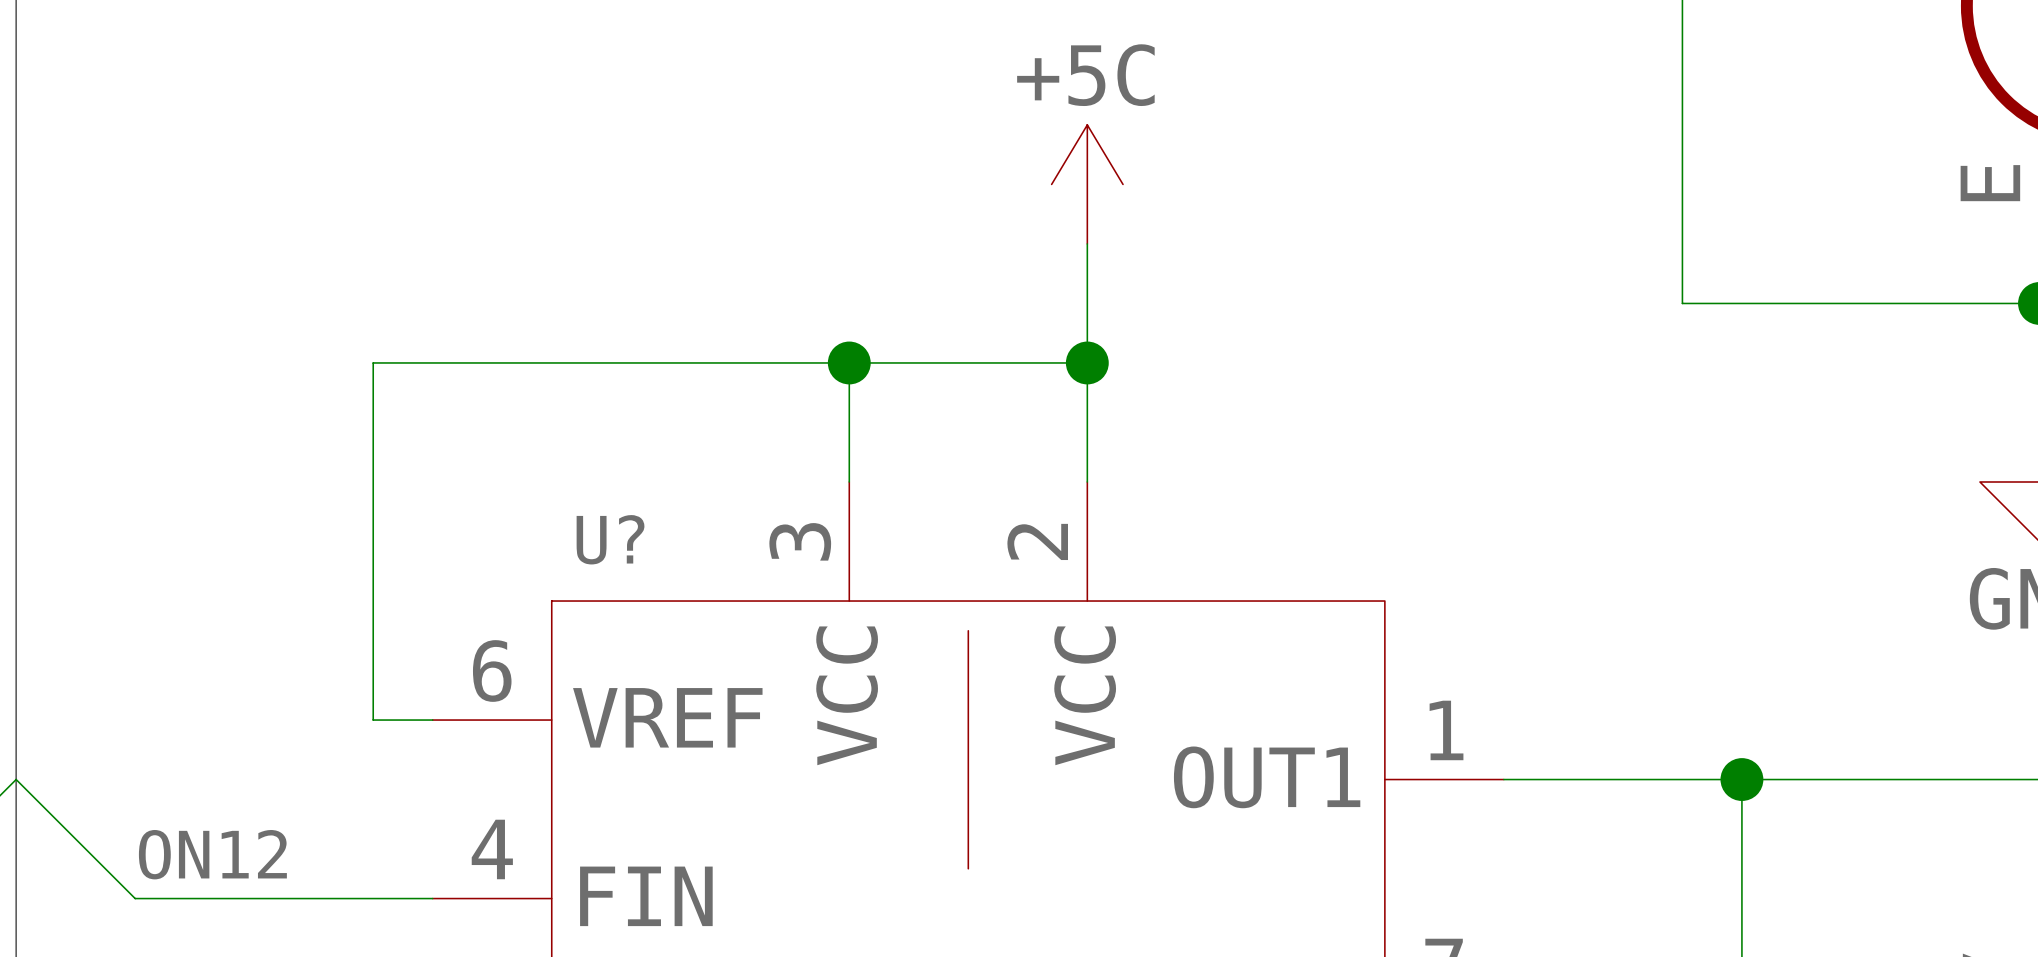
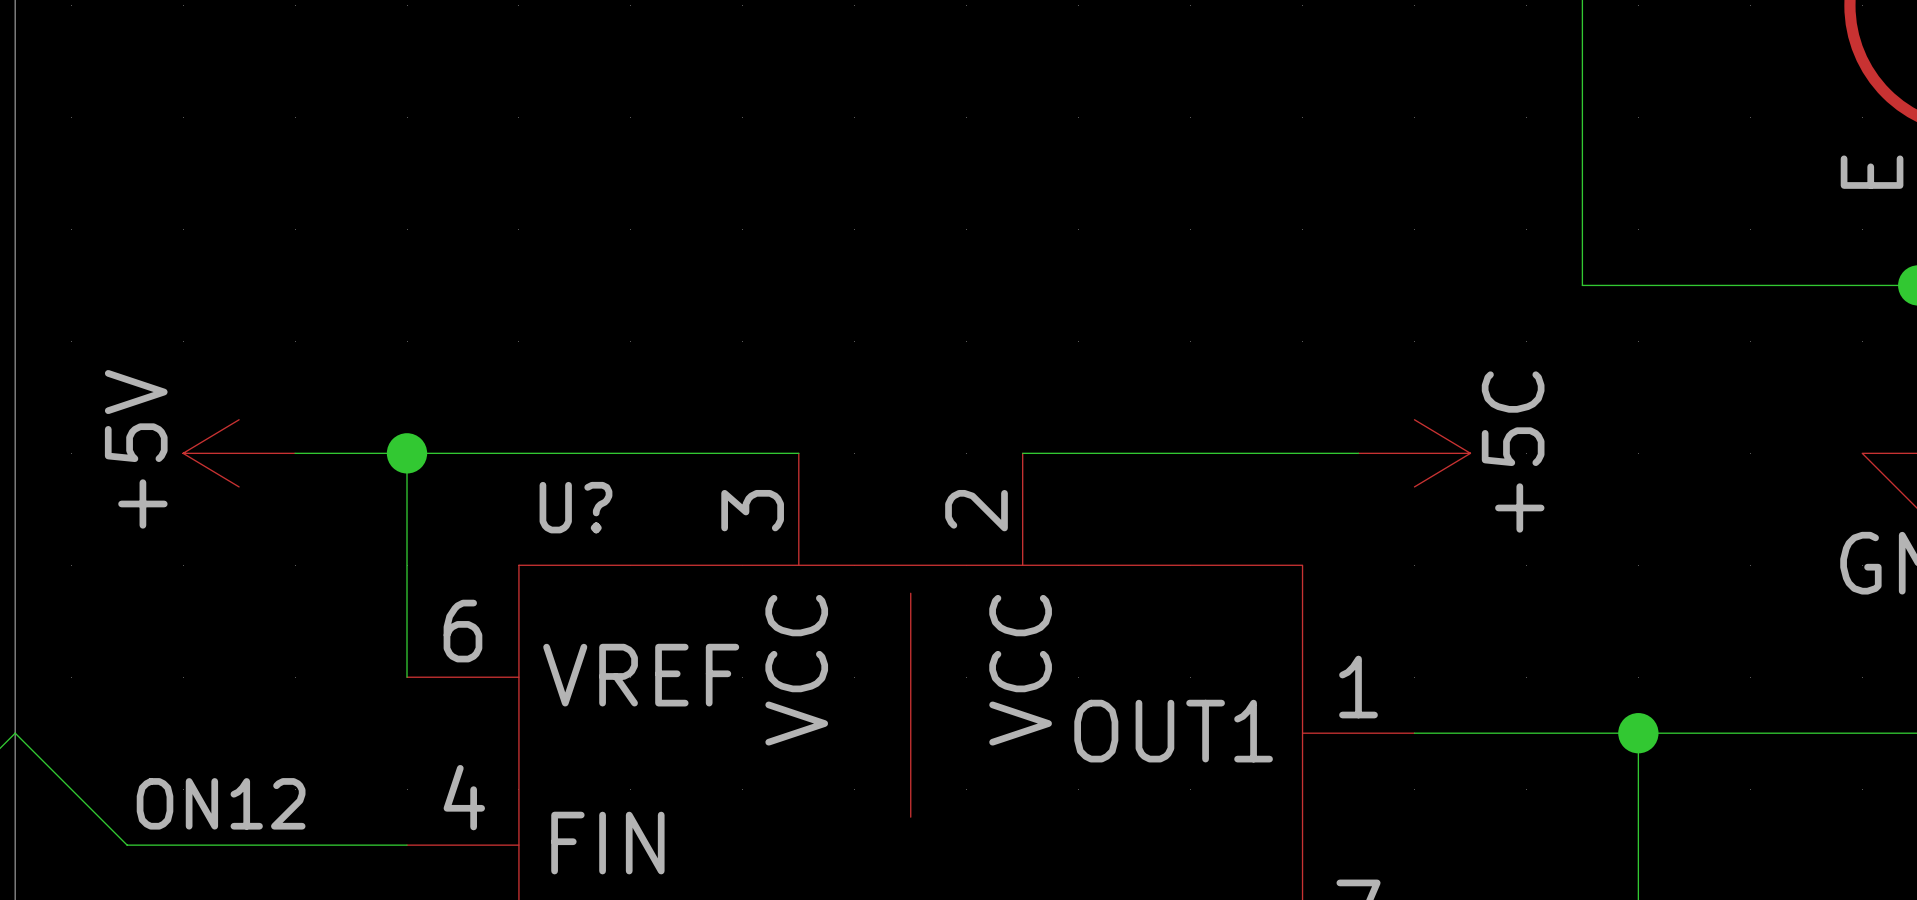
power symbol rotation: 0° (1087, 184) -> 90° clockwise (1414, 453)
power symbol position: +5C (1087, 184) -> +5C (1414, 453)
wire: (1087, 243) (1087, 481) -> (1358, 453) (1022, 453)
wire: (849, 362) (849, 481) -> (295, 453) (798, 453)
junction: (849, 362) -> none
wire: (1087, 362) (373, 362) (373, 720) (432, 720) -> (407, 453) (407, 677)
junction: (1087, 362) -> none
power symbol: none -> +5V (239, 453)
junction: none -> (407, 453)

